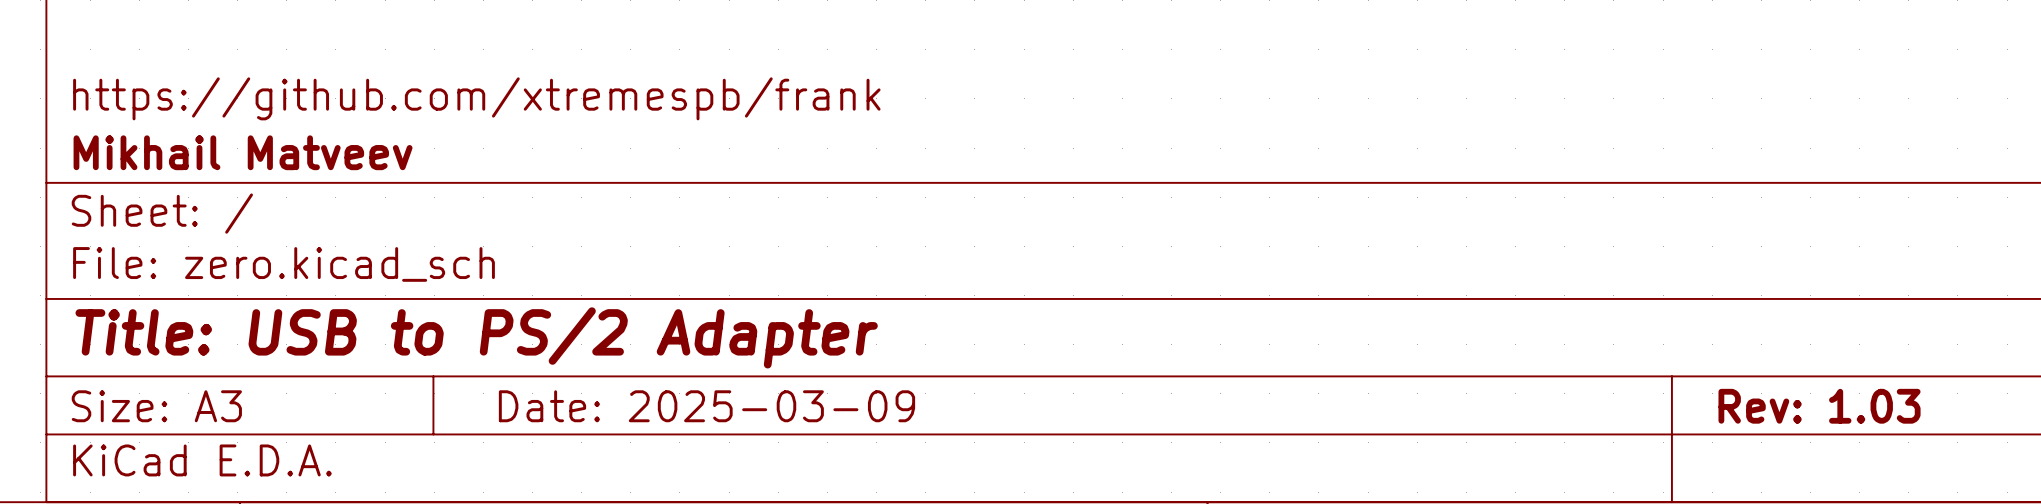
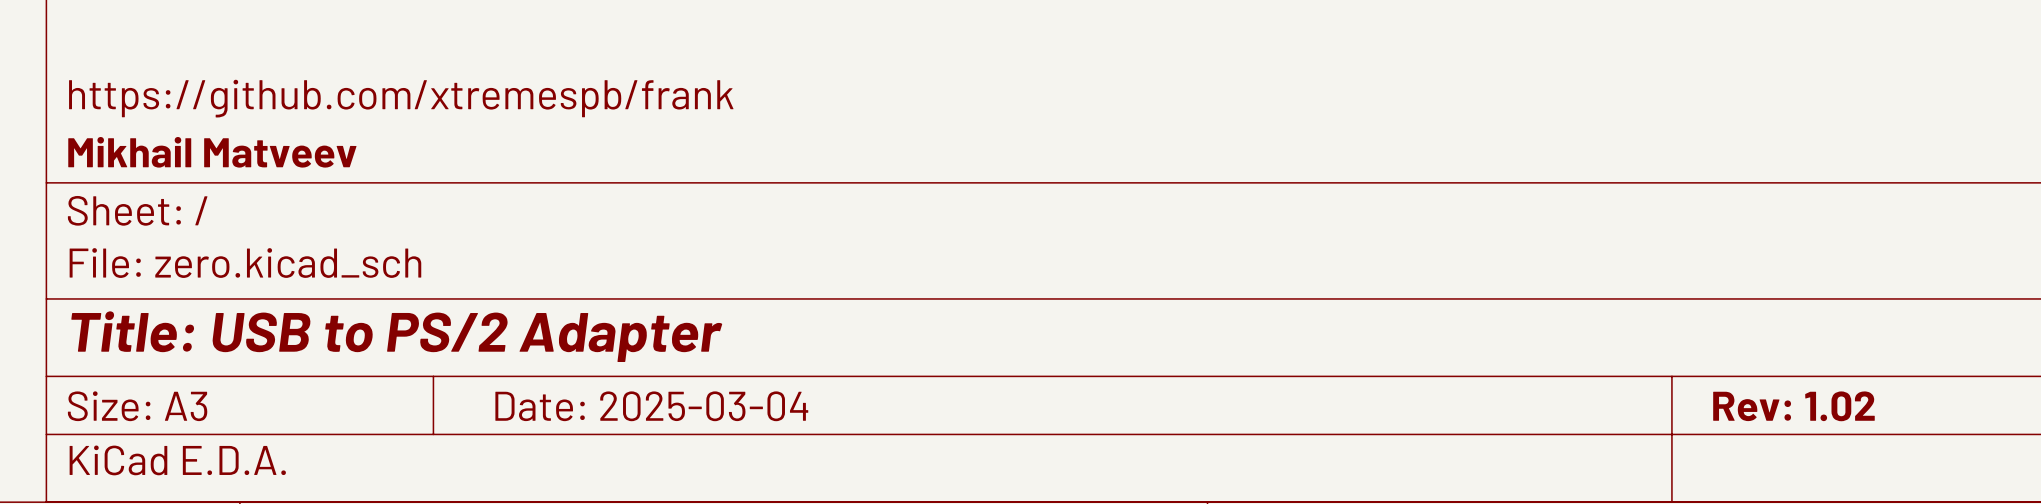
title block: Date: 2025-03-09 (706, 406) -> Date: 2025-03-04 (651, 406)
title block: Rev: 1.03 (1819, 406) -> Rev: 1.02 (1793, 406)

